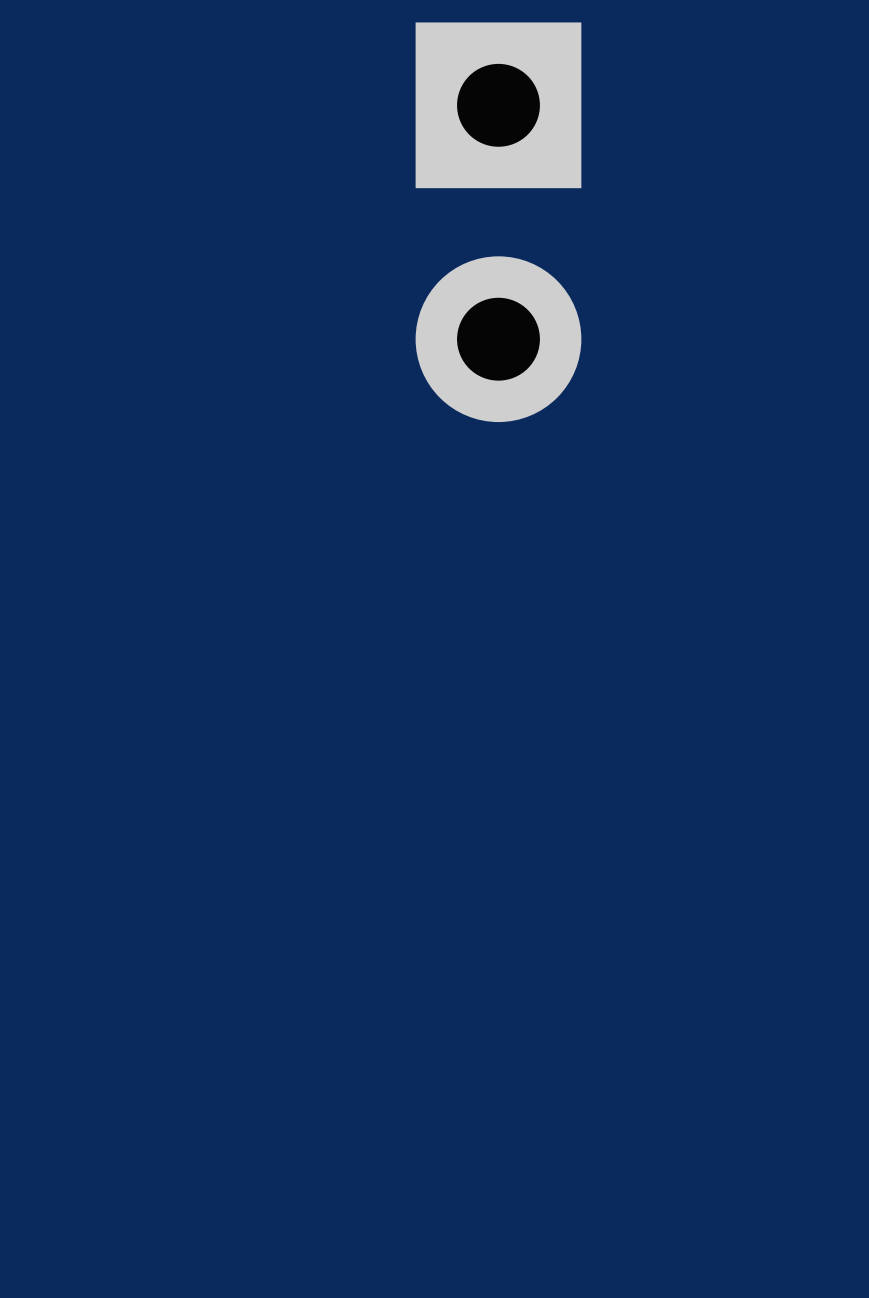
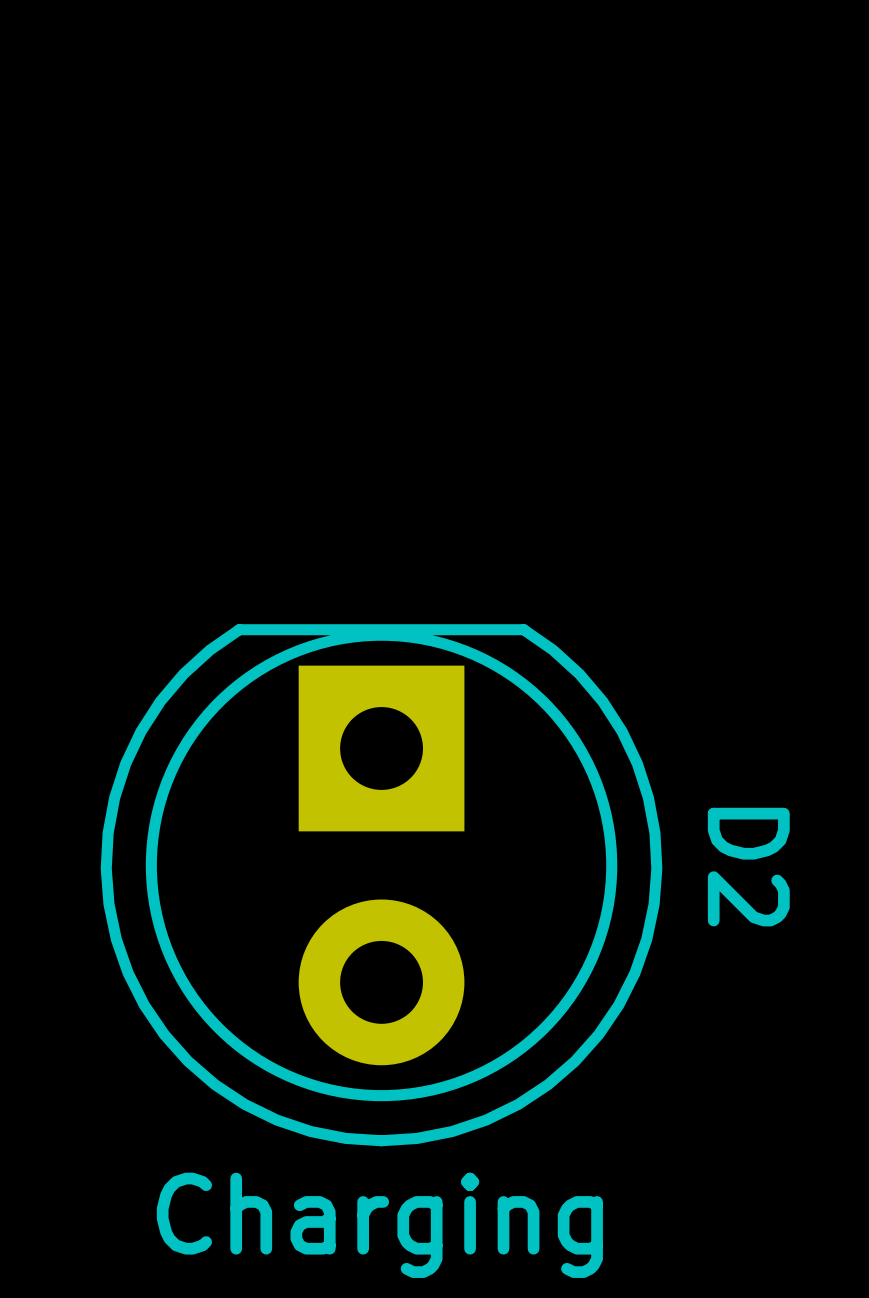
D2 side: top (498, 222) -> bottom (381, 885)
text: none -> Charging (379, 1225)

